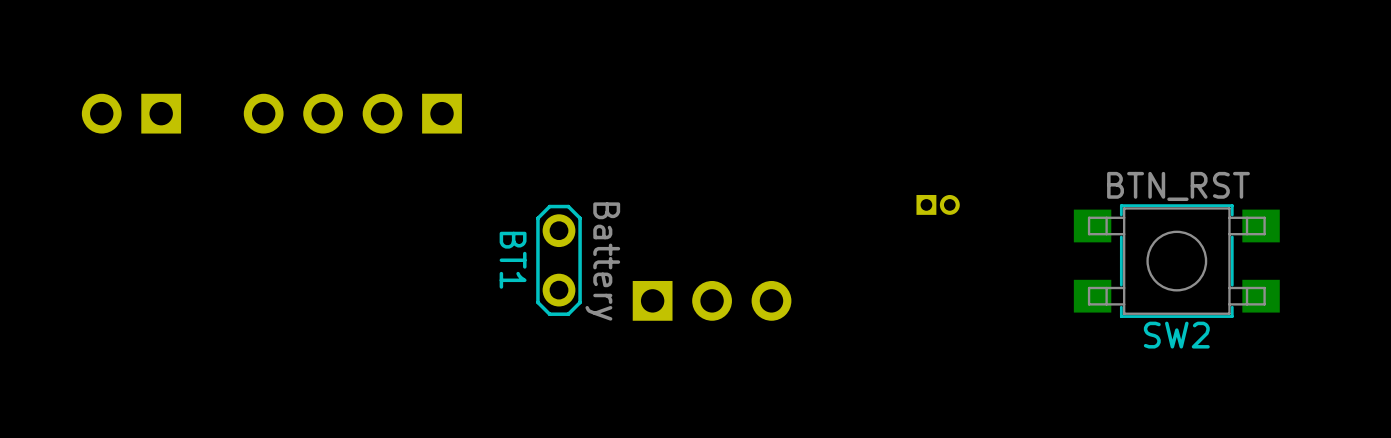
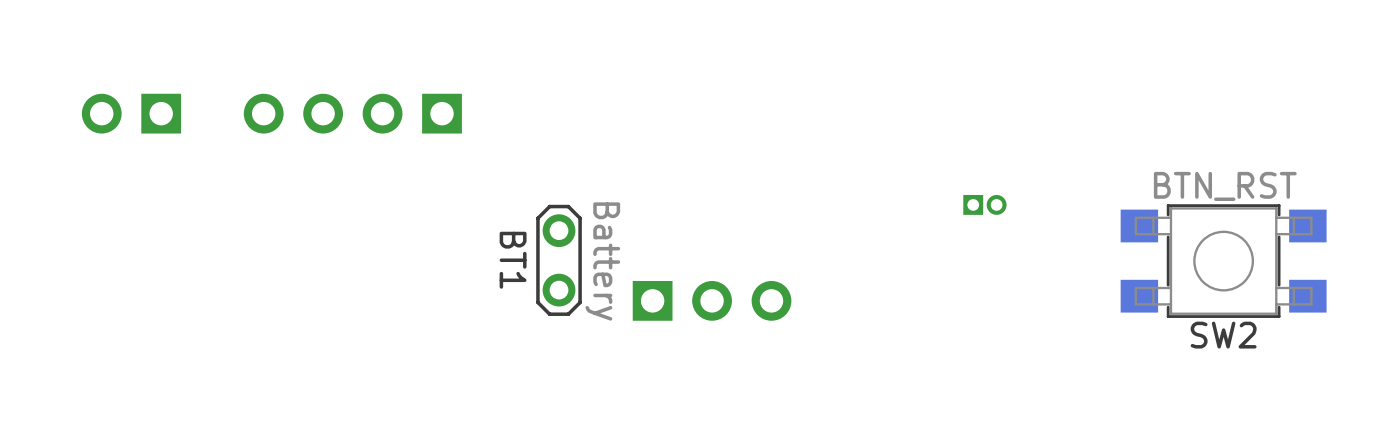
part position: (938, 204) -> (984, 204)
SW2 position: (1176, 261) -> (1223, 261)

